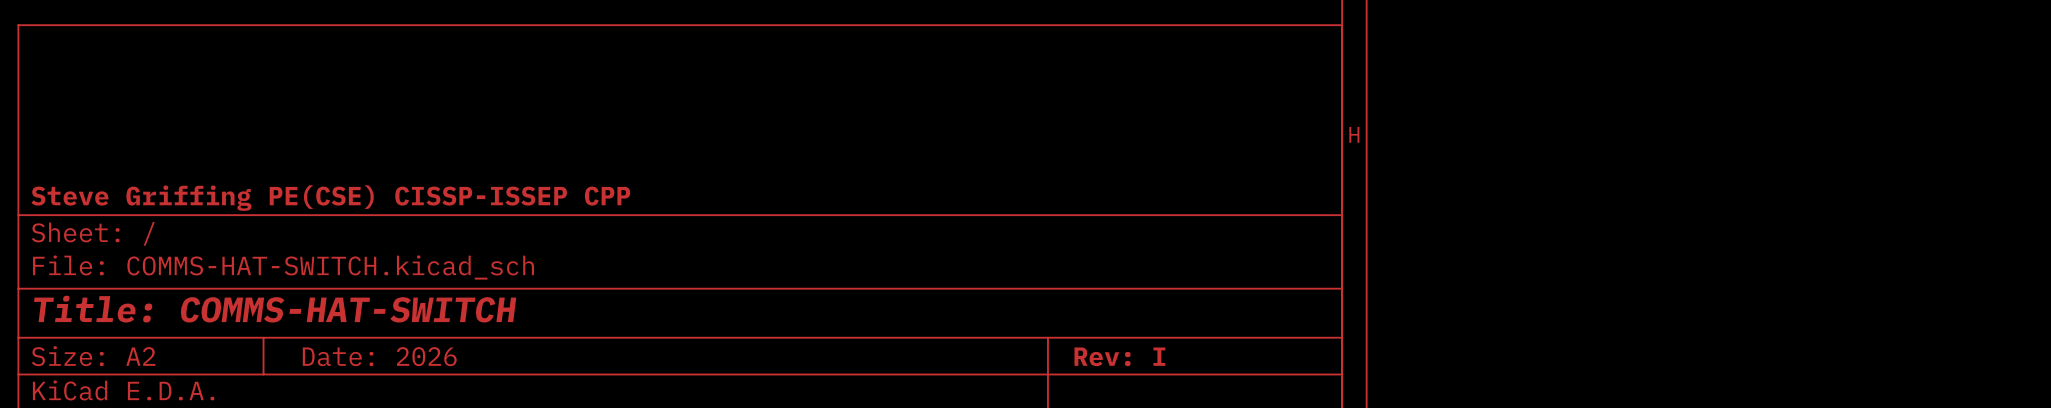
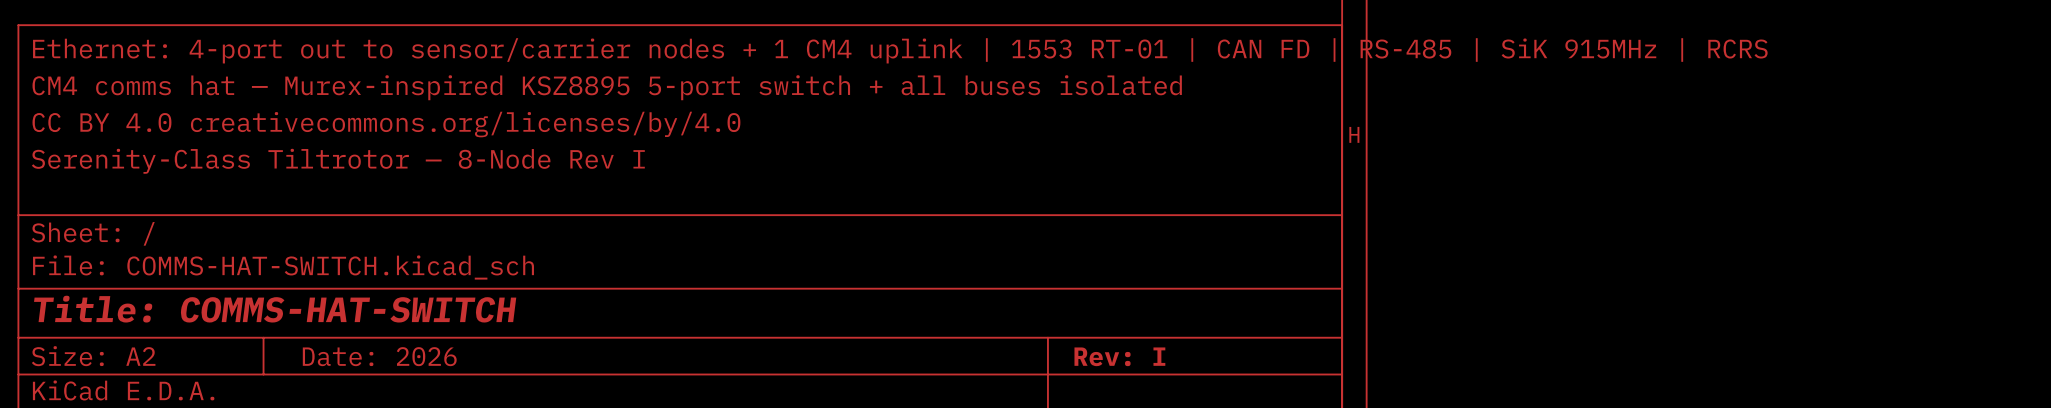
title block: none -> Ethernet: 4-port out to sensor/carrier nodes + 1 CM4 uplink | 1553 RT-01 | CAN FD | RS-485 | SiK 915MHz | RCRS (900, 50)
title block: none -> CM4 comms hat — Murex-inspired KSZ8895 5-port switch + all buses isolated (607, 87)
title block: none -> CC BY 4.0 creativecommons.org/licenses/by/4.0 (386, 124)
title block: none -> Serenity-Class Tiltrotor — 8-Node Rev I (338, 161)
title block: Steve Griffing PE(CSE) CISSP-ISSEP CPP (330, 198) -> none

